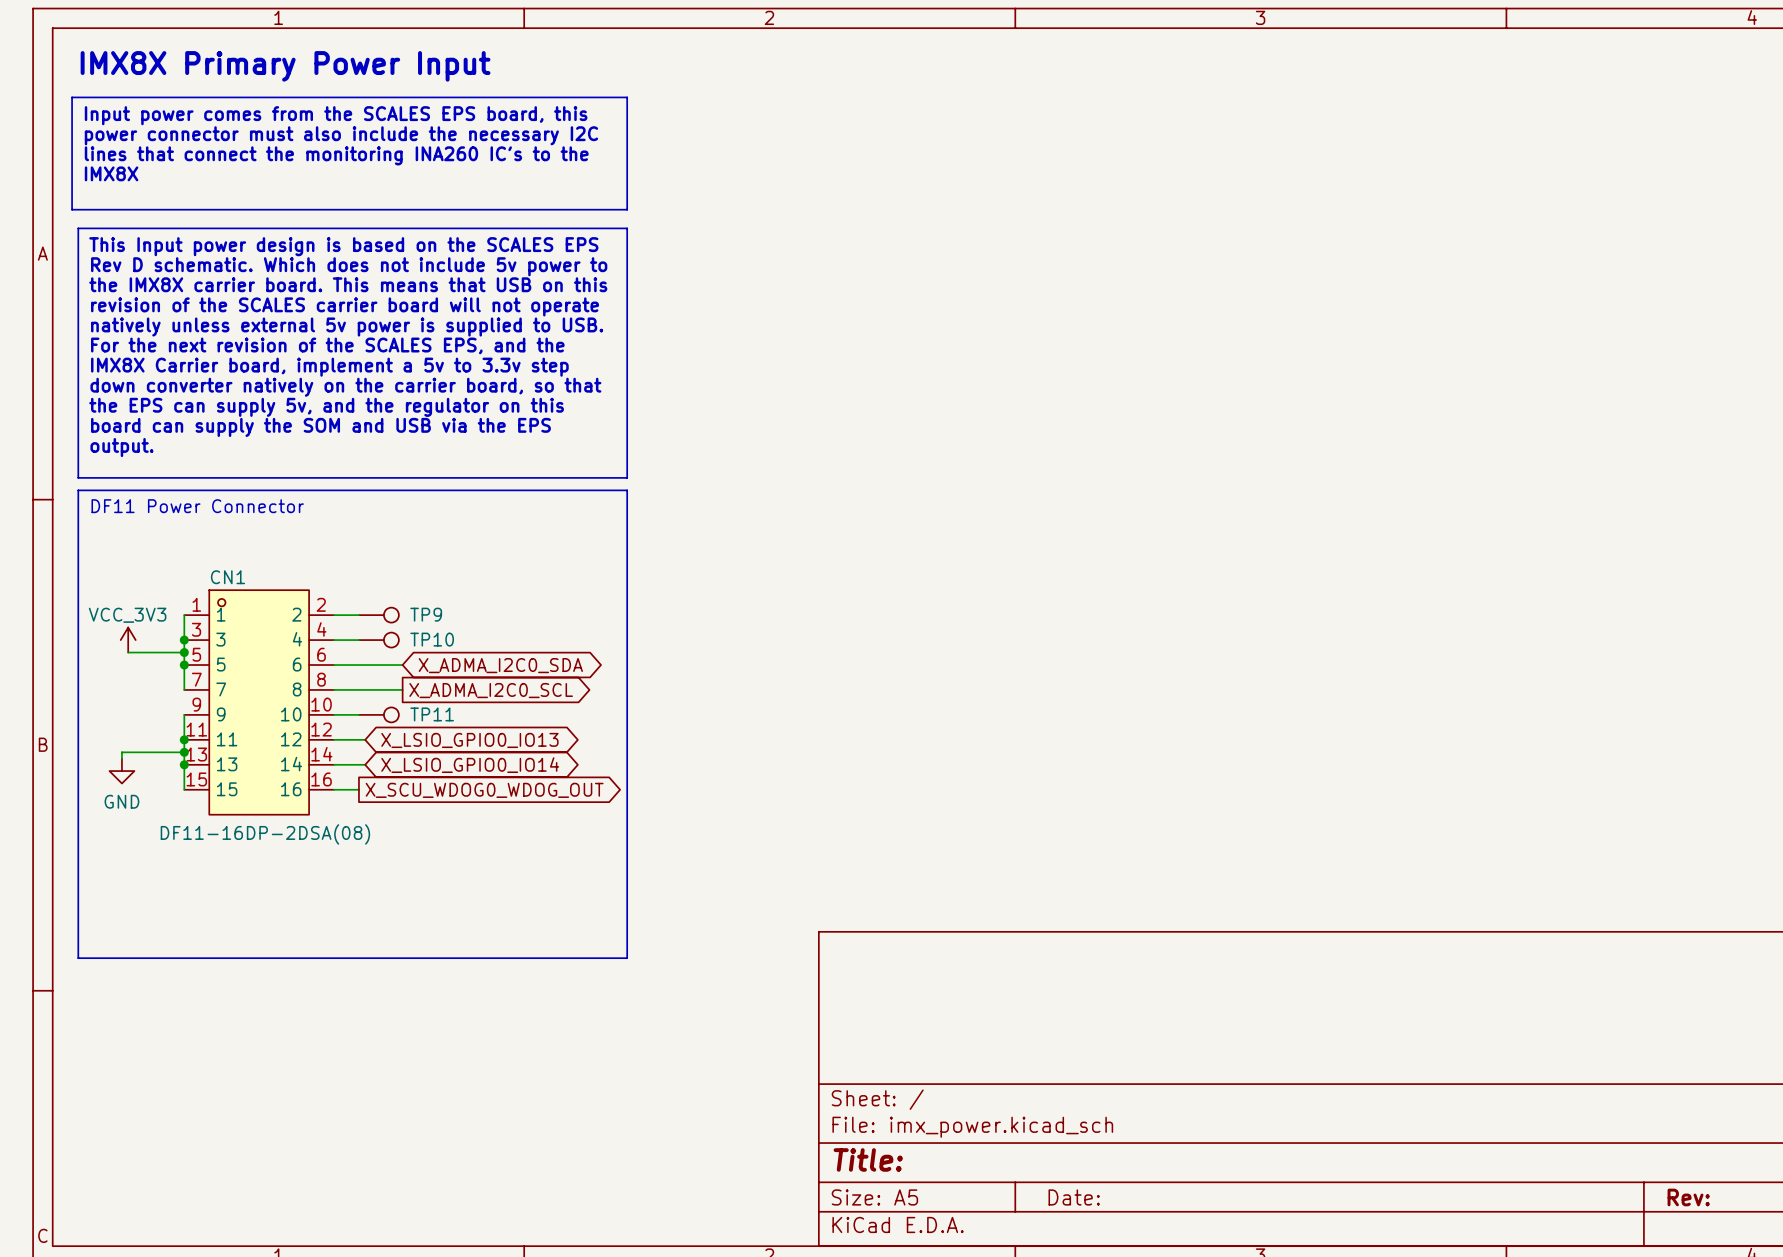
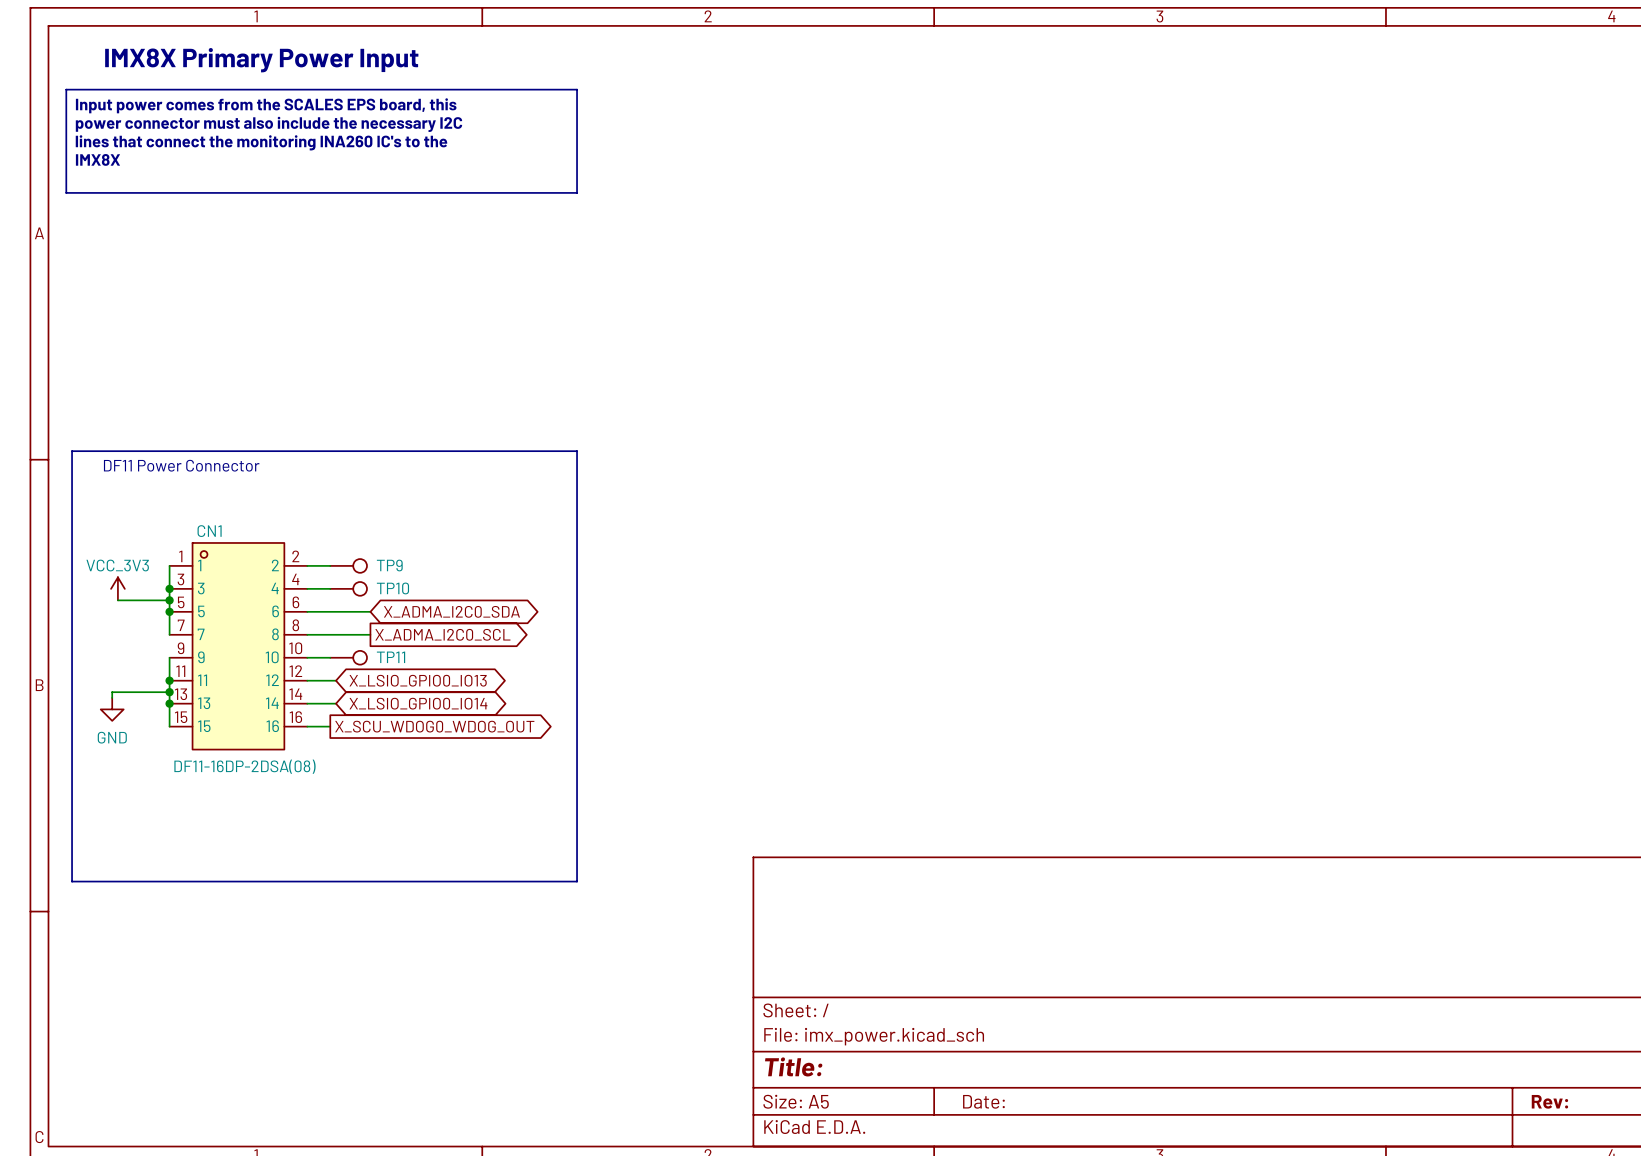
line: (78, 228) (627, 228) (627, 477) (78, 477) (78, 228) -> none
text: This Input power design is based on the SCALES EPS (343, 246) -> none
text: Rev D schematic. Which does not include 5v power to (349, 266) -> none
text: the IMX8X carrier board. This means that USB on this (348, 284) -> none
text: revision of the SCALES carrier board will not operate (345, 306) -> none
text: natively unless external 5v power is supplied to USB. (347, 327) -> none
text: For the next revision of the SCALES EPS, and the (327, 345) -> none
text: IMX8X Carrier board, implement a 5v to 3.3v step (329, 367) -> none
text: down converter natively on the carrier board, so that (345, 387) -> none
text: the EPS can supply 5v, and the regulator on this (326, 407) -> none
text: board can supply the SOM and USB via the EPS (320, 427) -> none
text: output. (121, 447) -> none

